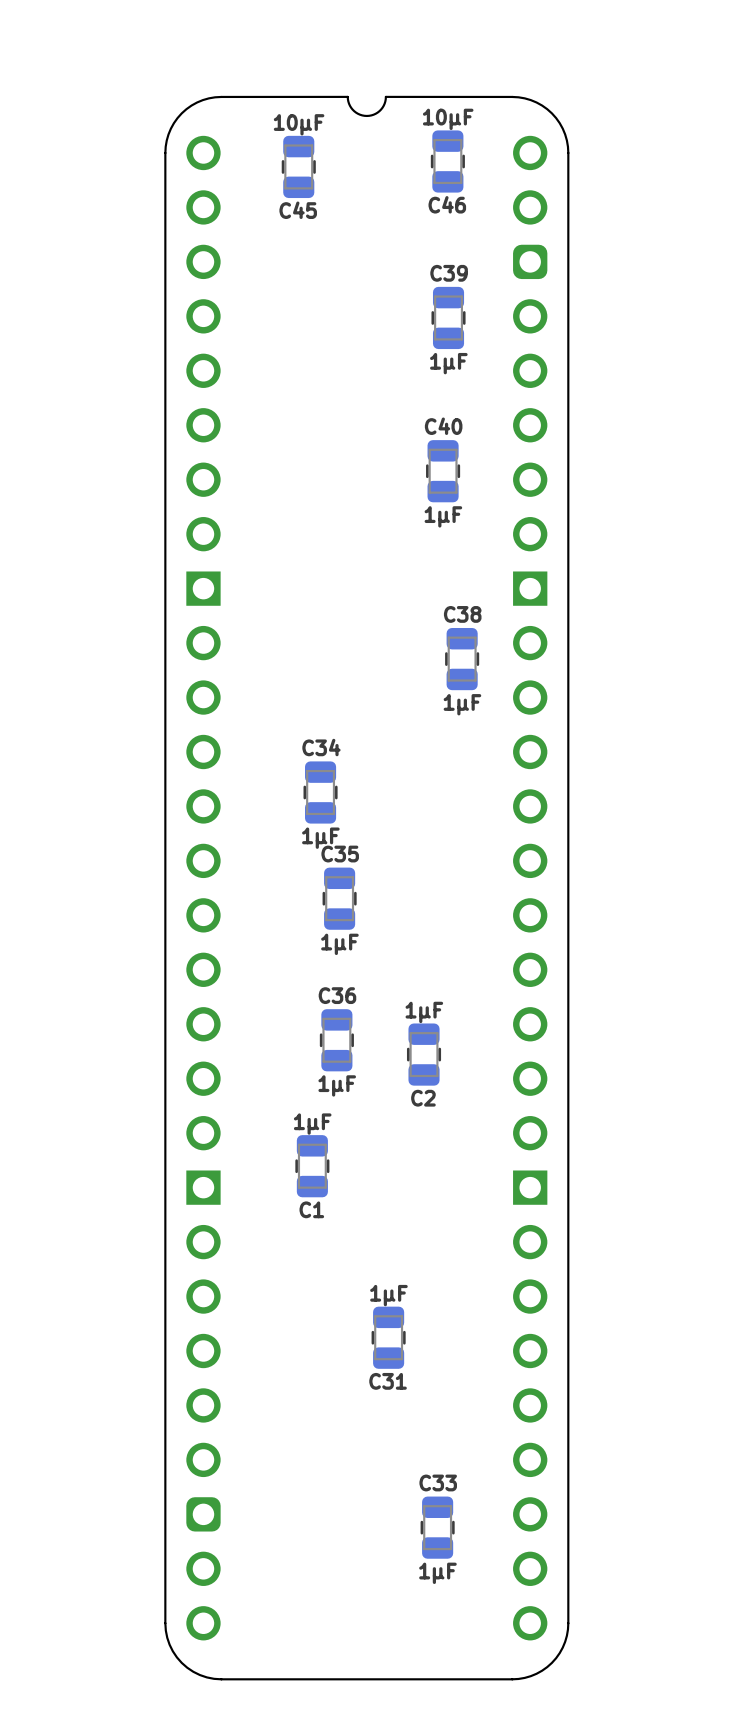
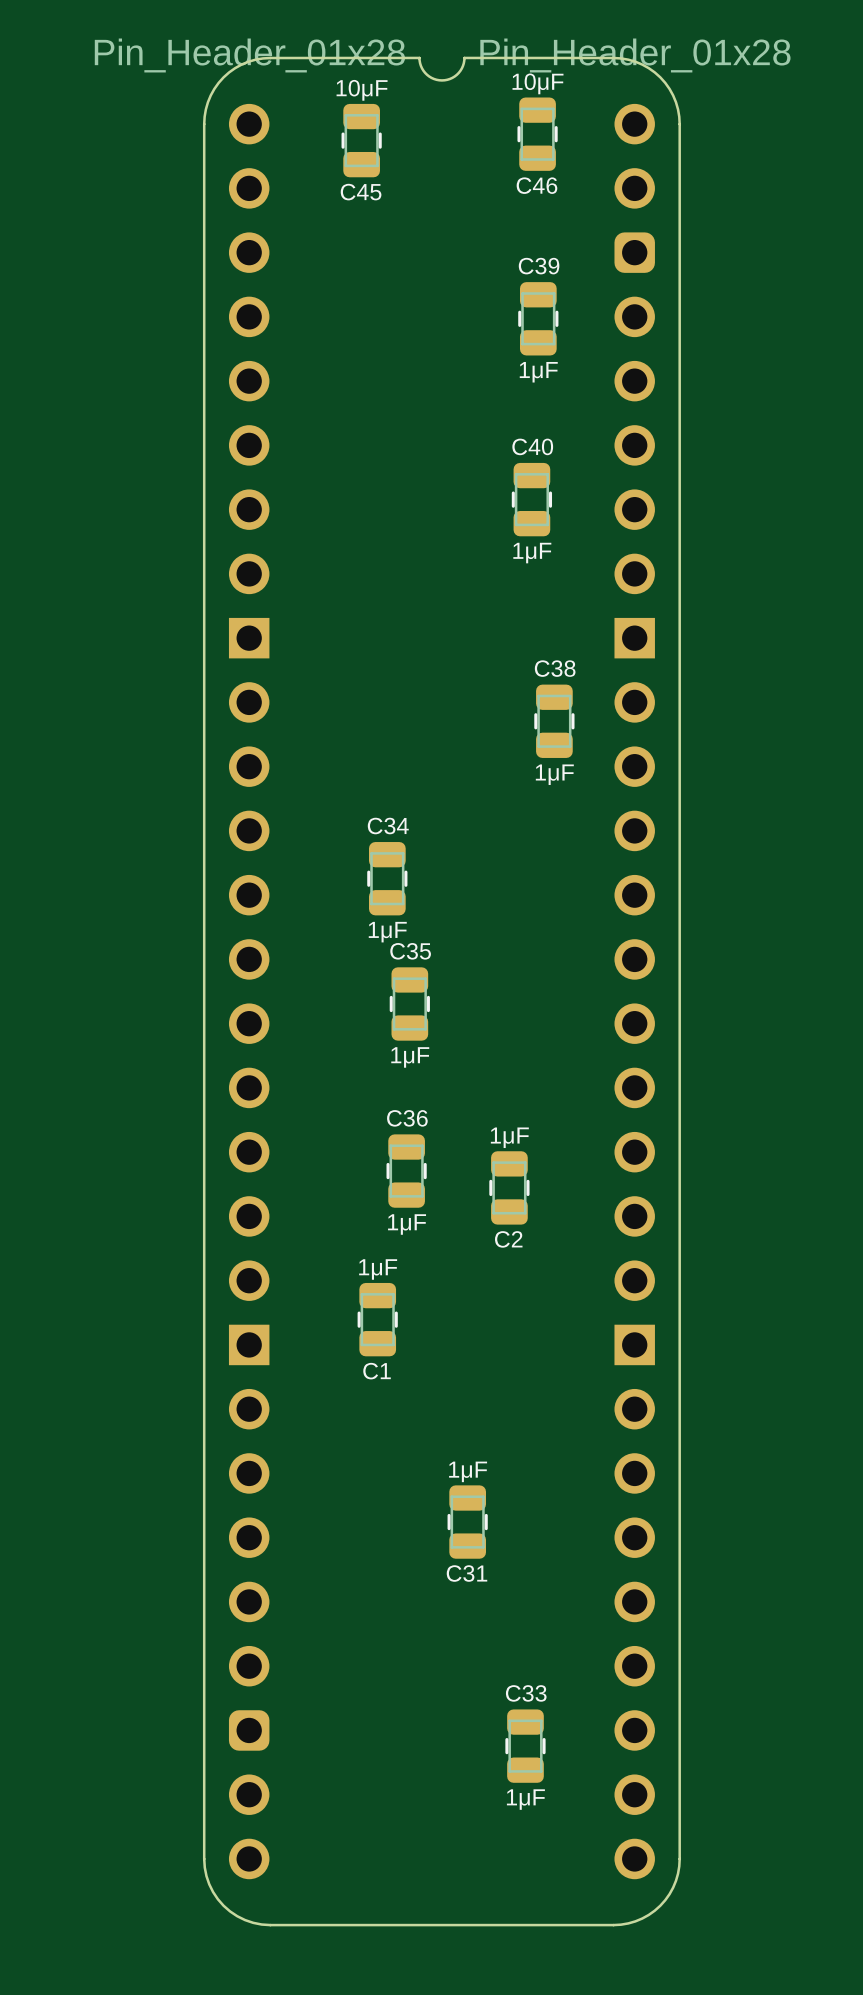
drawing: none -> [94, 38, 791, 73]

